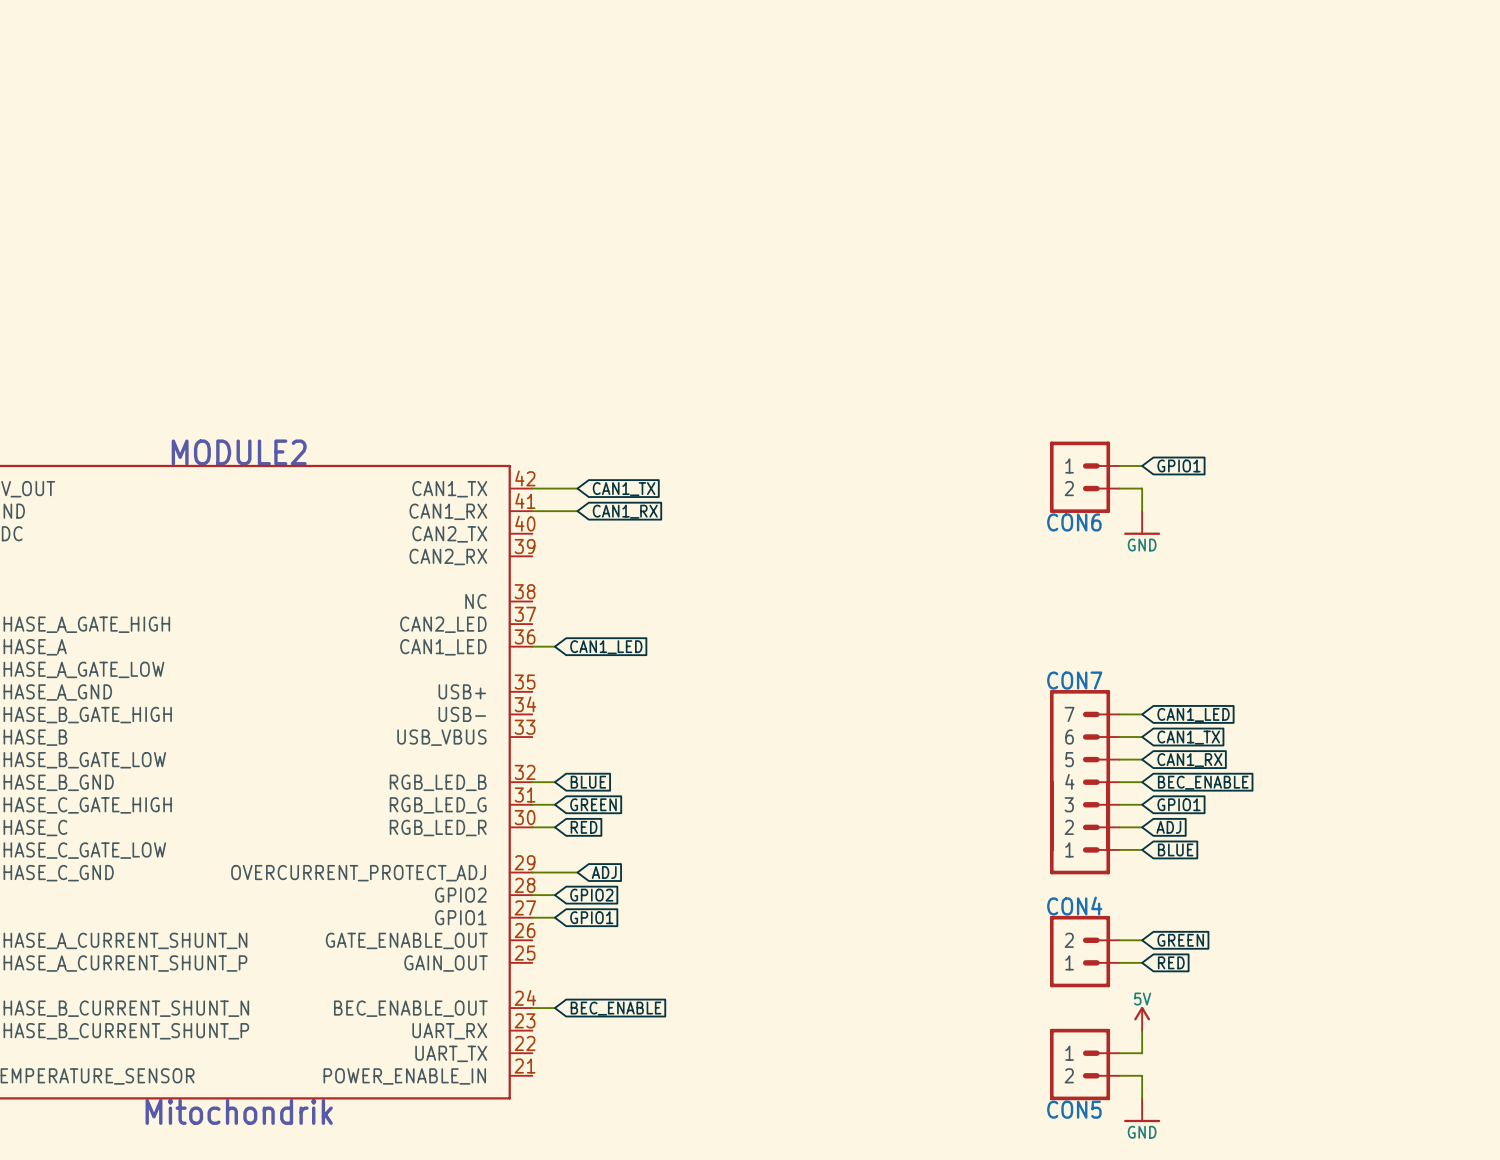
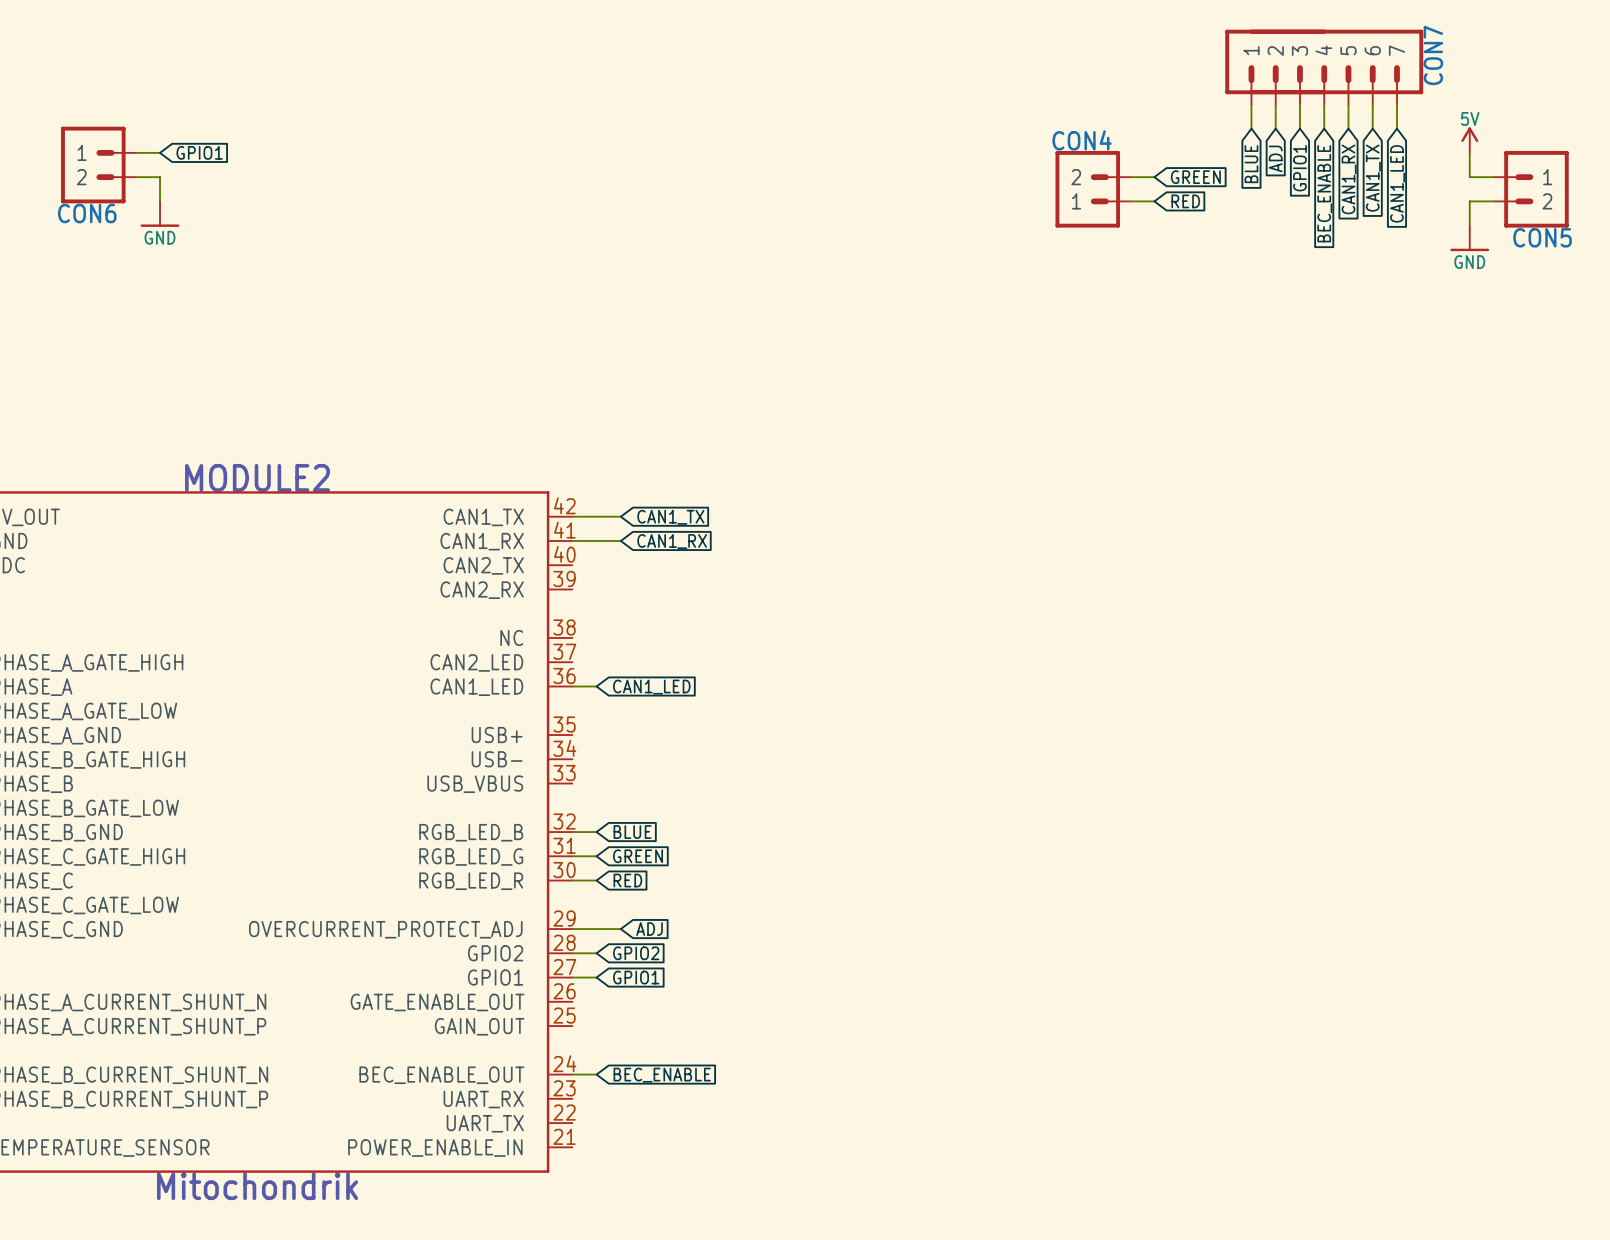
wire: none -> (1251, 104) (1251, 128)
wire: none -> (1275, 104) (1275, 128)
wire: none -> (1299, 104) (1299, 128)
wire: none -> (1324, 104) (1324, 128)
wire: none -> (1348, 104) (1348, 128)
wire: none -> (1372, 104) (1372, 128)
wire: none -> (1396, 104) (1396, 128)
power symbol: none -> 5V (1469, 140)
wire: none -> (135, 152) (160, 152)
global label: none -> GPIO1 (199, 152)
wire: none -> (1469, 152) (1469, 177) (1494, 177)
global label: none -> ADJ (1275, 158)
global label: none -> BLUE (1251, 164)
global label: none -> GPIO1 (1299, 168)
wire: none -> (135, 177) (160, 177) (160, 201)
wire: none -> (1130, 177) (1154, 177)
global label: none -> GREEN (1195, 177)
global label: none -> CAN1_TX (1373, 178)
global label: none -> CAN1_RX (1349, 179)
global label: none -> CAN1_LED (1397, 183)
global label: none -> BEC_ENABLE (1324, 193)
wire: none -> (1130, 201) (1154, 201)
global label: none -> RED (1185, 201)
wire: none -> (1494, 201) (1469, 201) (1469, 225)
power symbol: none -> GND (160, 214)
power symbol: none -> GND (1469, 238)
wire: (1119, 465) (1142, 465) -> none
global label: GPIO1 (1179, 465) -> none
CON6 position: (1084, 477) -> (98, 165)
wire: (1119, 488) (1142, 488) (1142, 511) -> none
power symbol: GND (1142, 523) -> none
wire: (1119, 714) (1142, 714) -> none
global label: CAN1_LED (1193, 714) -> none
wire: (1119, 737) (1142, 737) -> none
global label: CAN1_TX (1188, 737) -> none
wire: (1119, 759) (1142, 759) -> none
global label: CAN1_RX (1189, 760) -> none
CON7 rotation: 0° (1080, 782) -> 90° clockwise (1324, 61)
CON7 position: (1084, 782) -> (1324, 67)
wire: (1119, 782) (1142, 782) -> none
global label: BEC_ENABLE (1203, 782) -> none
wire: (1119, 804) (1142, 804) -> none
global label: GPIO1 (1179, 804) -> none
wire: (1119, 827) (1142, 827) -> none
global label: ADJ (1168, 827) -> none
wire: (1119, 849) (1142, 849) -> none
global label: BLUE (1175, 849) -> none
wire: (1119, 940) (1142, 940) -> none
global label: GREEN (1180, 940) -> none
CON4 position: (1084, 951) -> (1092, 189)
wire: (1119, 962) (1142, 962) -> none
global label: RED (1171, 962) -> none
power symbol: 5V (1142, 1018) -> none
wire: (1142, 1030) (1142, 1053) (1119, 1053) -> none
CON5 flip: as is (1080, 1064) -> left-right (1536, 189)
CON5 position: (1084, 1064) -> (1531, 189)
wire: (1119, 1075) (1142, 1075) (1142, 1098) -> none
power symbol: GND (1142, 1110) -> none

